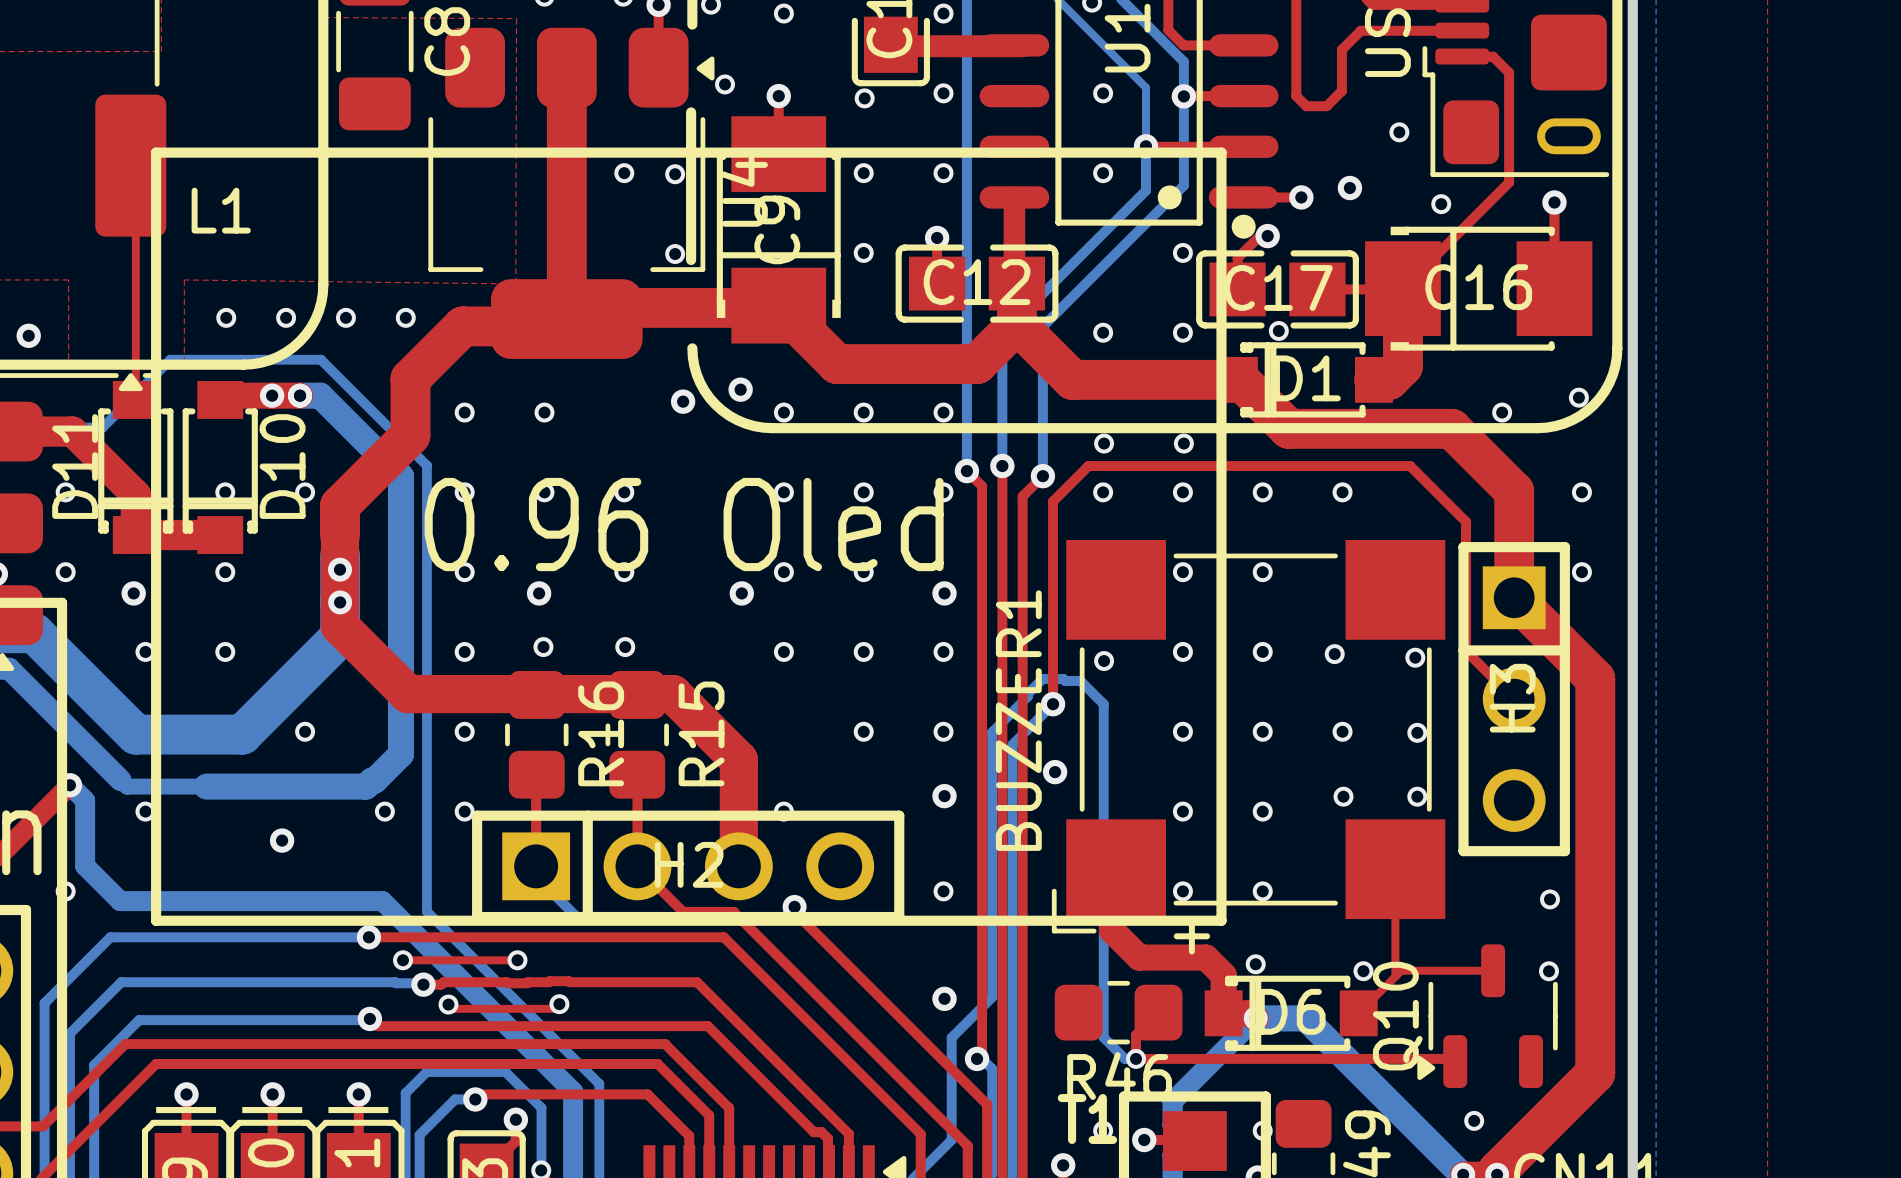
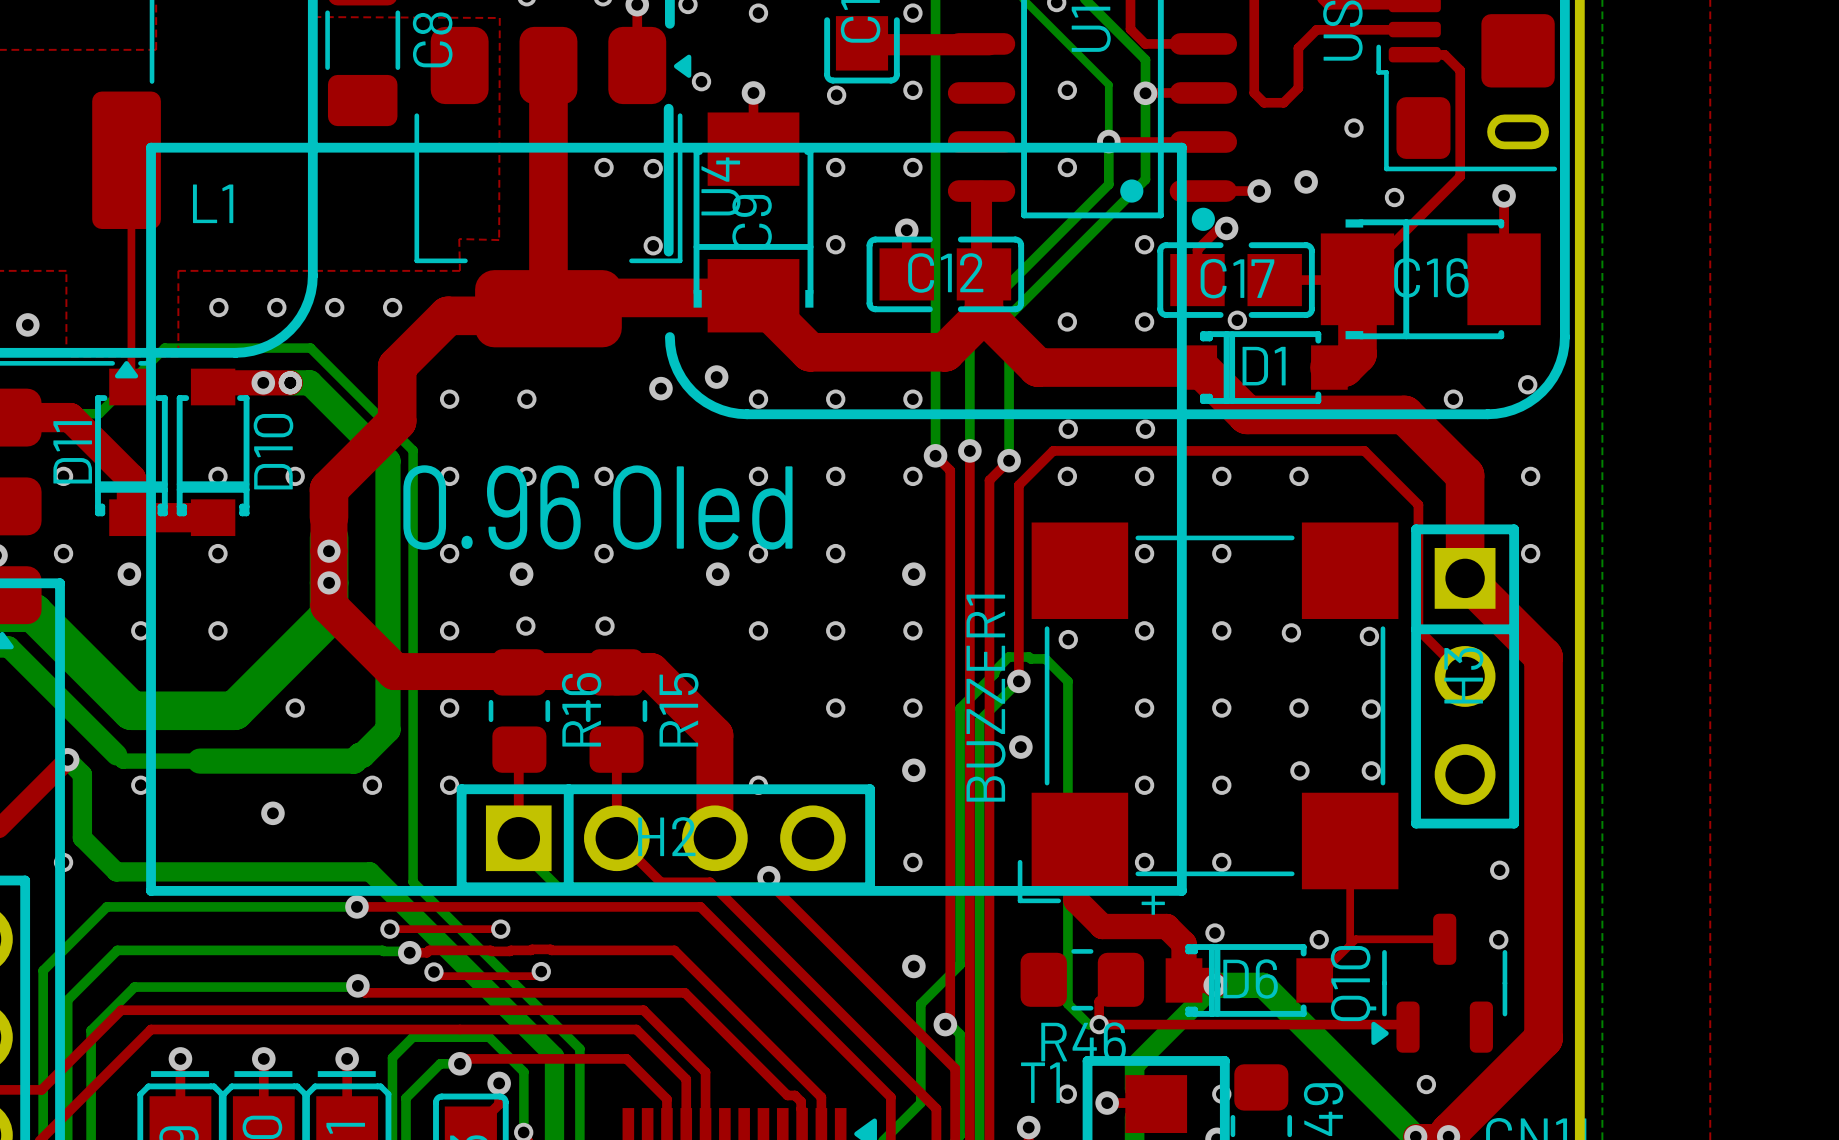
top zone outline: (516, 18) (515, 283) (184, 279) -> (499, 18) (499, 240) (459, 239) (459, 270) (178, 270)

